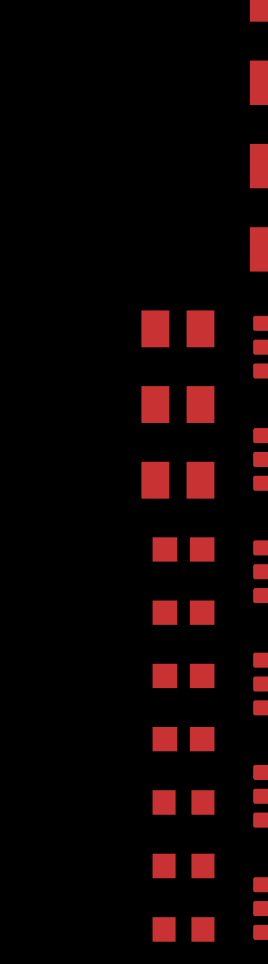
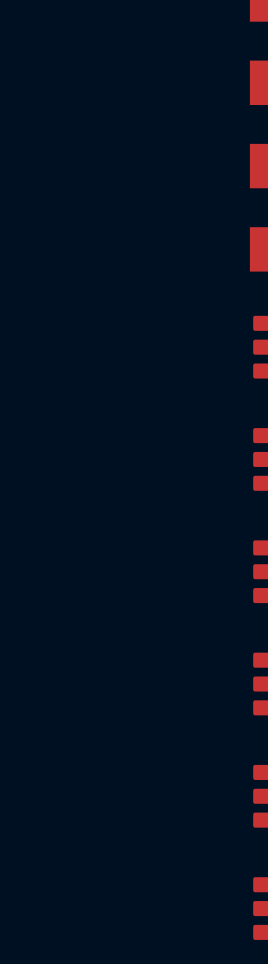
part: (177, 328) -> none
part: (177, 404) -> none
part: (177, 480) -> none
part: (183, 549) -> none
part: (183, 612) -> none
part: (183, 675) -> none
part: (183, 739) -> none
part: (183, 802) -> none
part: (183, 865) -> none
part: (183, 929) -> none

